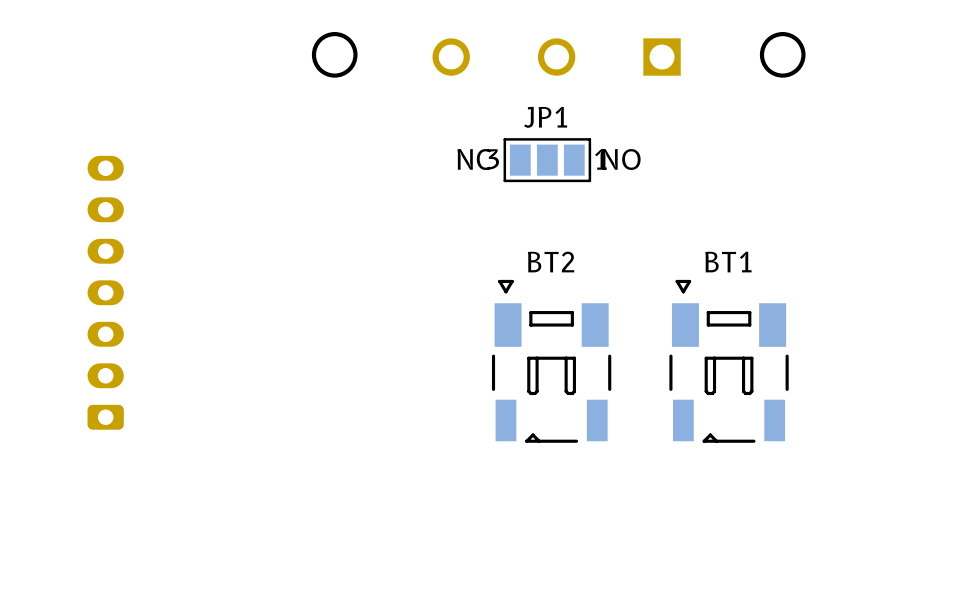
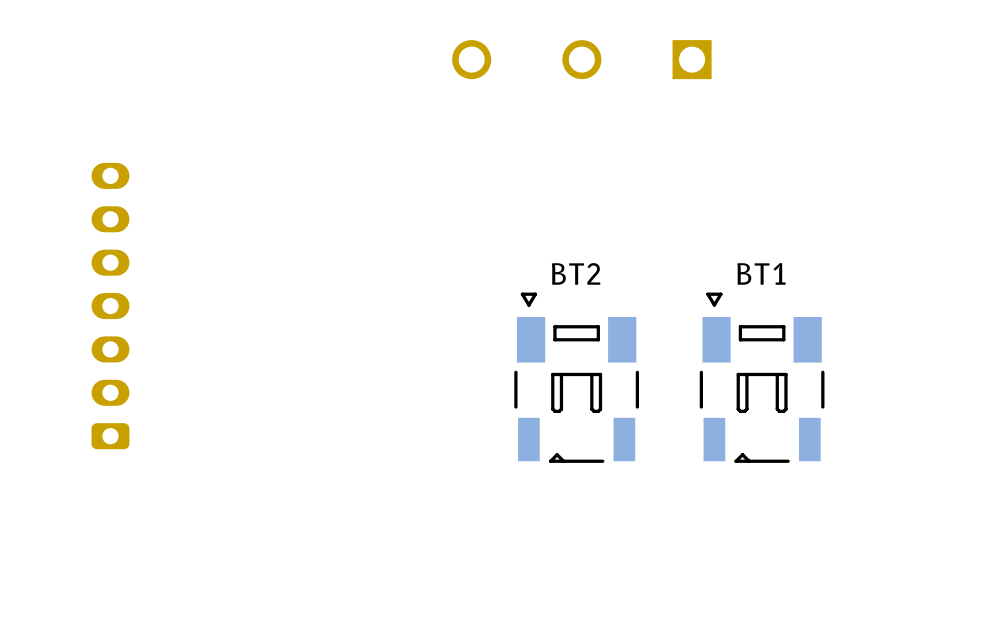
round board edge: [311, 32, 358, 78] -> none
round board edge: [759, 32, 806, 78] -> none
JP1: (547, 160) -> none

